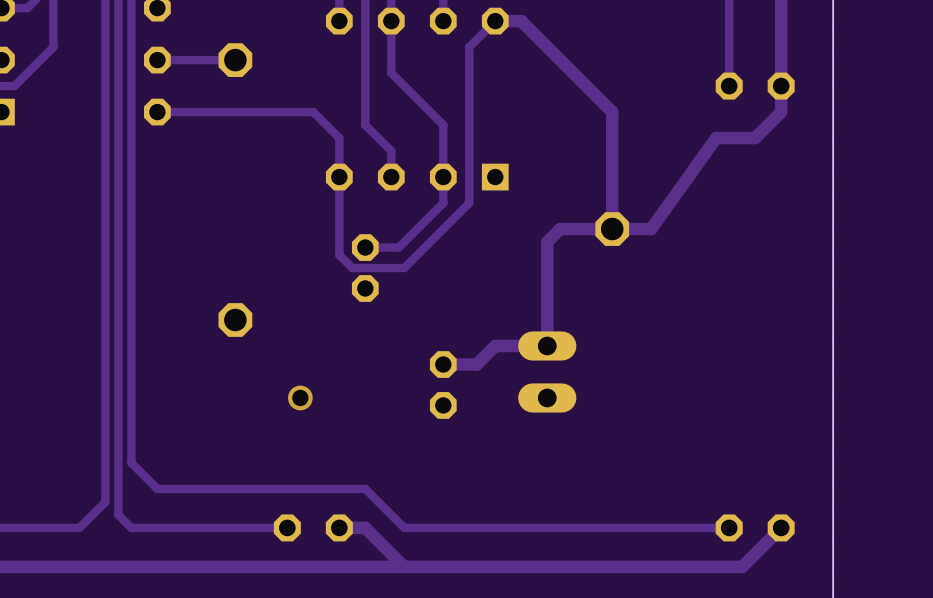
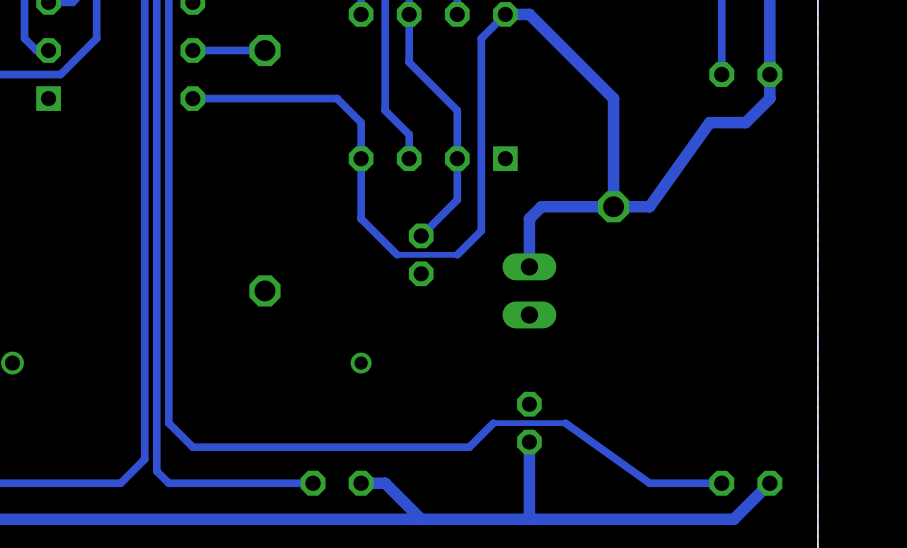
track: (443, 203) (398, 247) (365, 247) -> (457, 182) (457, 199) (421, 235)
track: (469, 203) (404, 268) (352, 268) (339, 255) (339, 242) -> (481, 182) (481, 230) (457, 254) (397, 254) (361, 218)
track: (560, 229) (547, 242) (547, 345) (495, 345) (476, 364) (443, 364) -> (565, 206) (541, 206) (529, 218) (529, 266)
part position: (365, 268) -> (421, 254)
part position: (547, 371) -> (529, 290)
part: (443, 384) -> none
via: (300, 397) -> none
via: none -> (361, 363)
part: none -> (529, 423)
track: none -> (529, 442) (529, 519)
track: (365, 488) (404, 527) (651, 527) -> (385, 447) (469, 447) (493, 423) (565, 423) (649, 483)

